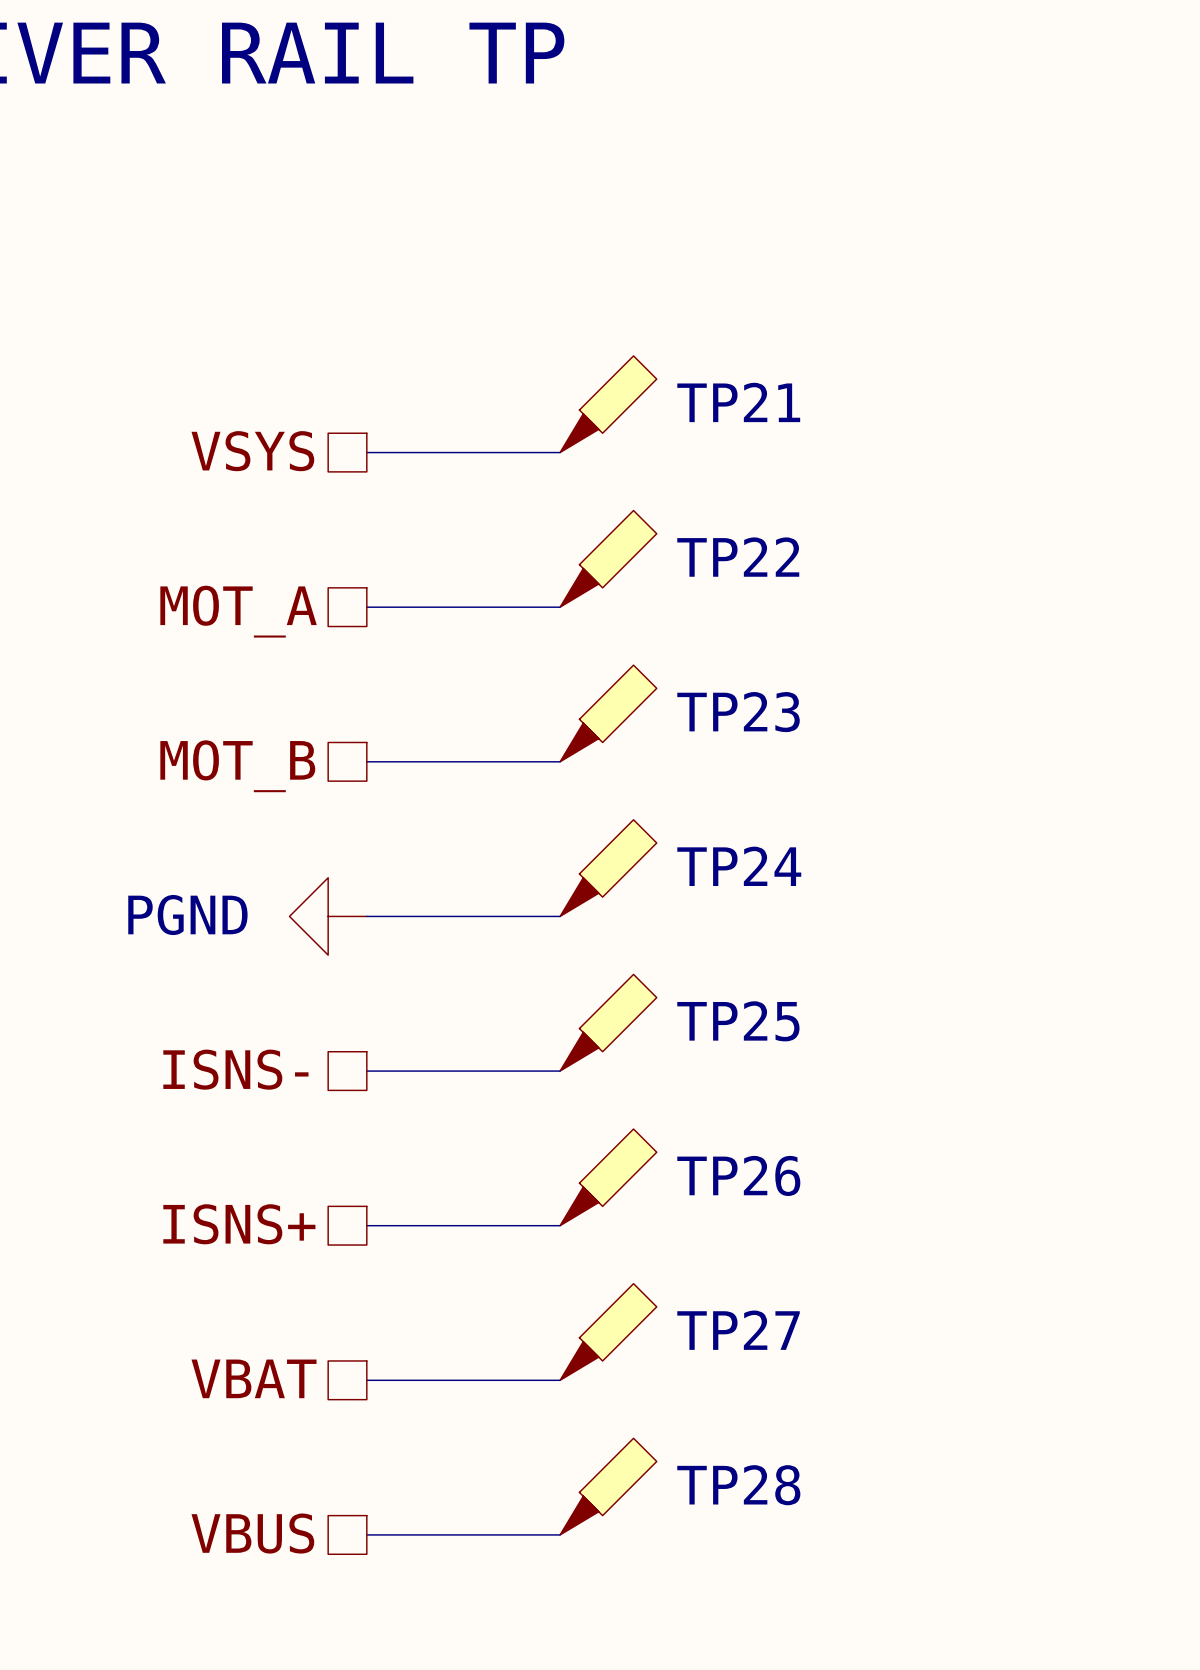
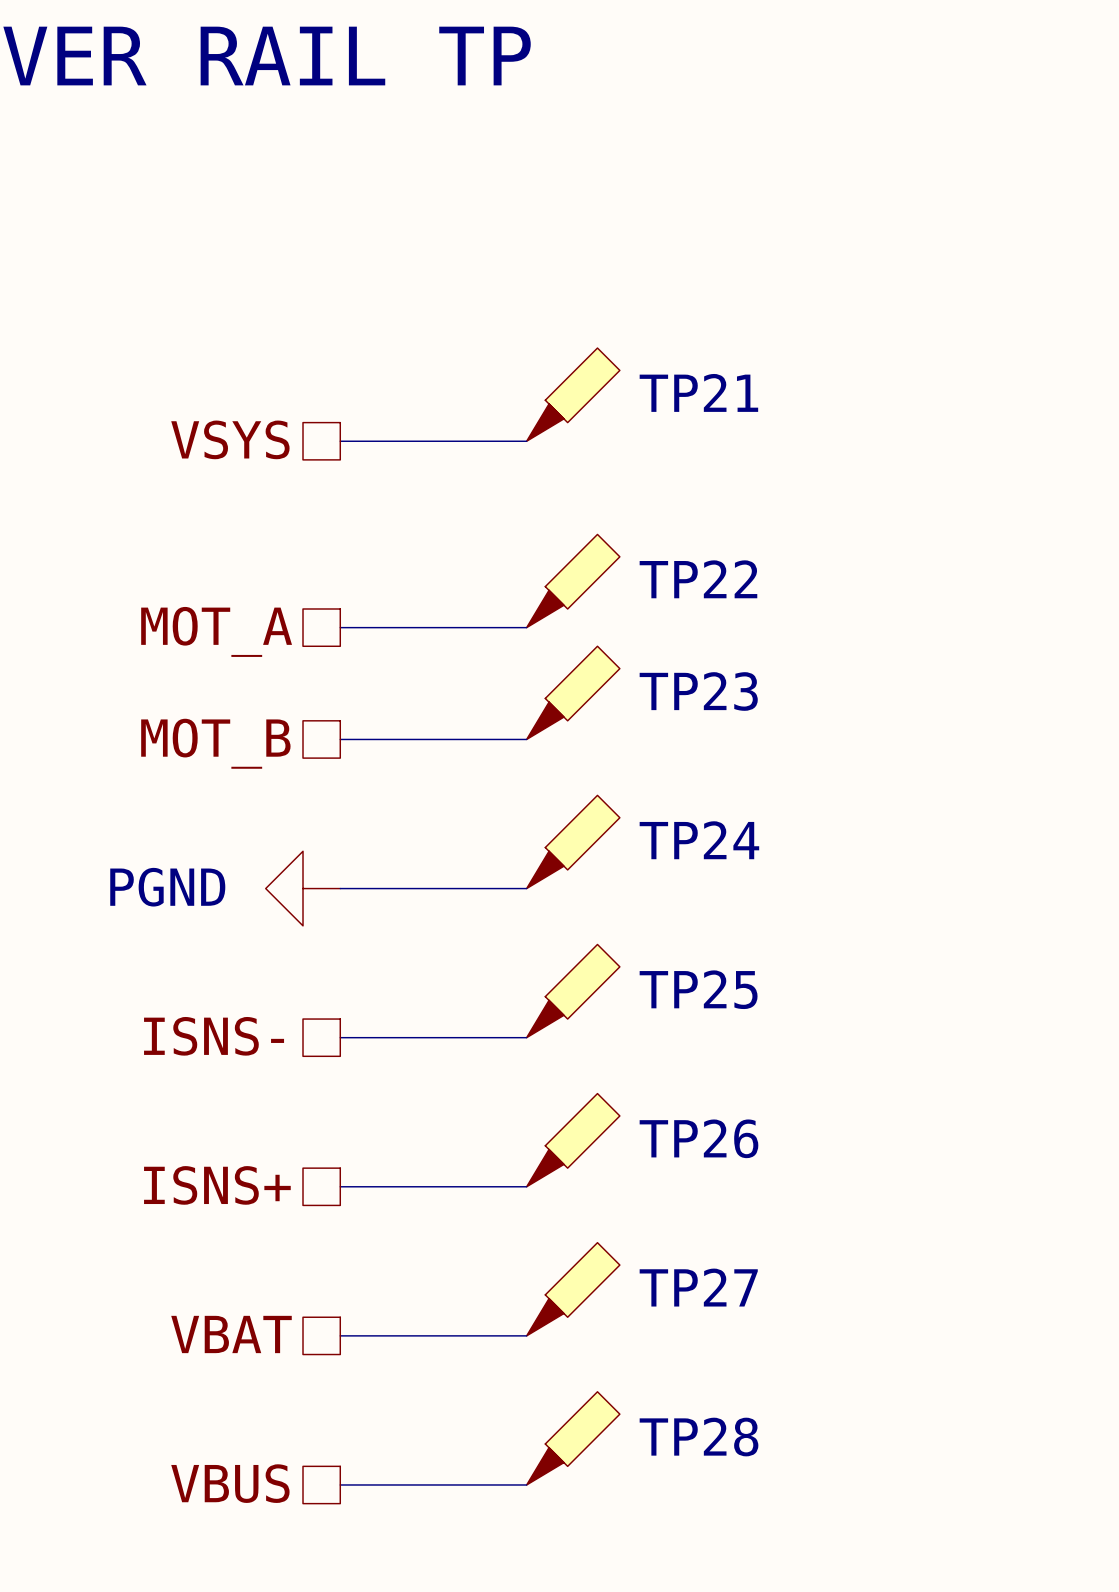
TP22 position: (608, 558) -> (573, 581)
wire: (366, 607) (560, 607) -> (340, 627) (526, 627)
hierarchical label position: MOT_A (238, 611) -> MOT_A (216, 631)

